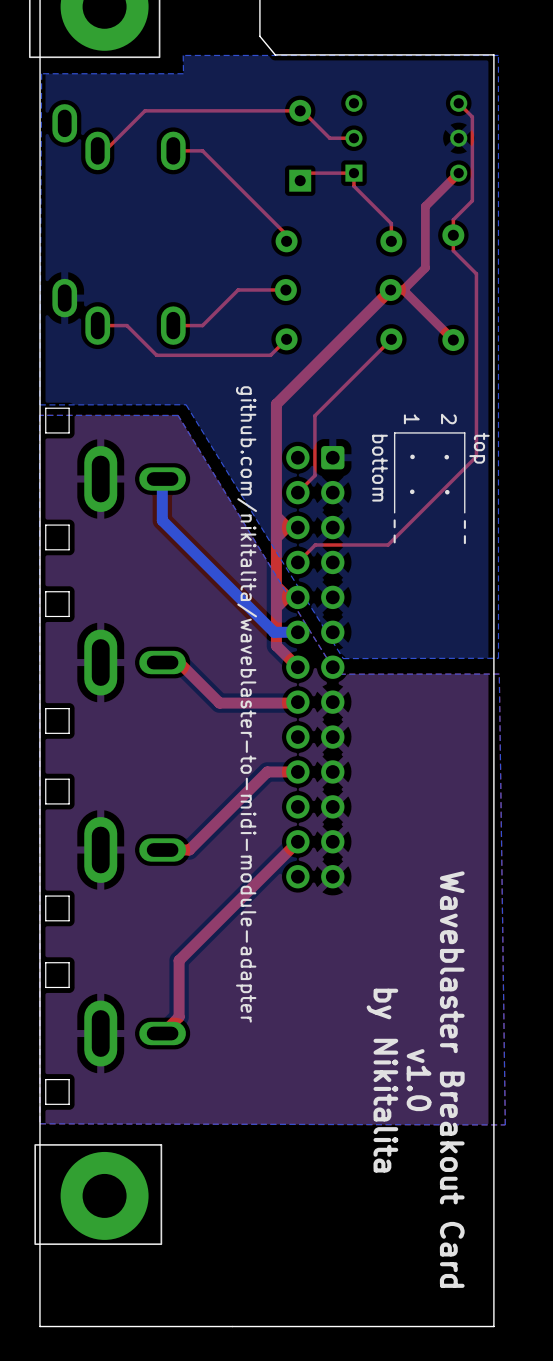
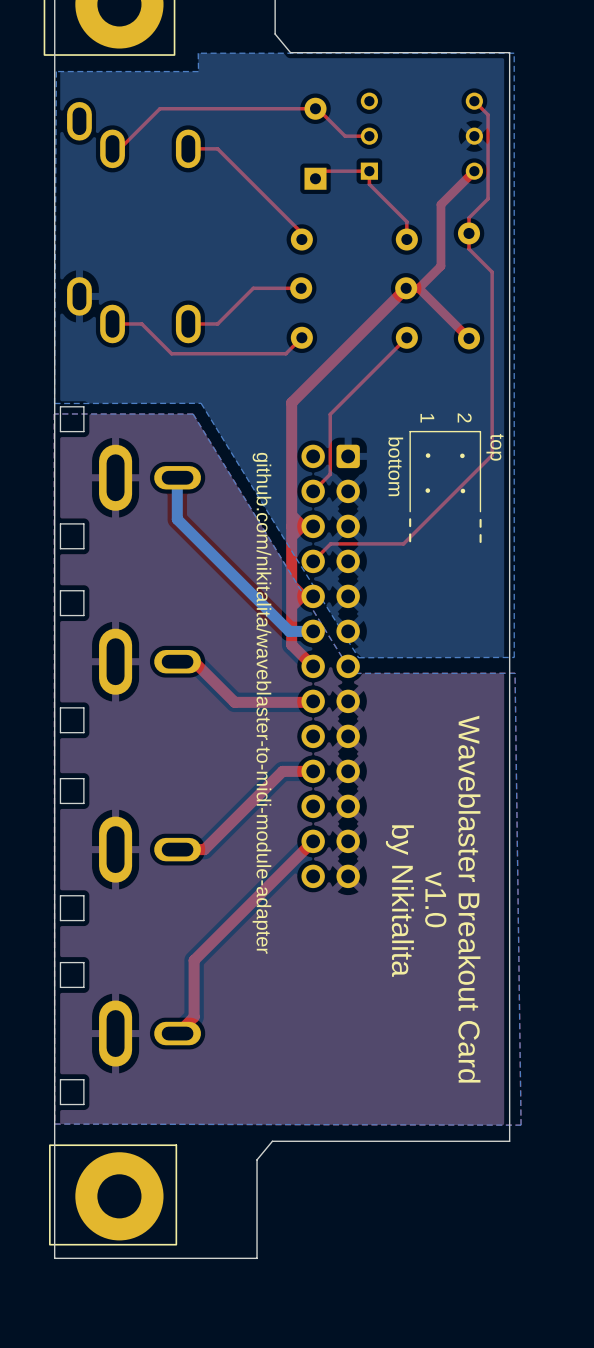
text position: Waveblaster Breakout Card (452, 1079) -> Waveblaster Breakout Card (469, 899)
text position: by Nikitalita (382, 1080) -> by Nikitalita (399, 901)
text position: v1.0 (419, 1080) -> v1.0 (435, 899)
board edge: (493, 1141) (493, 1326) (39, 1326) (39, 1257) -> (509, 1141) (272, 1141) (257, 1159) (257, 1258) (54, 1258)

